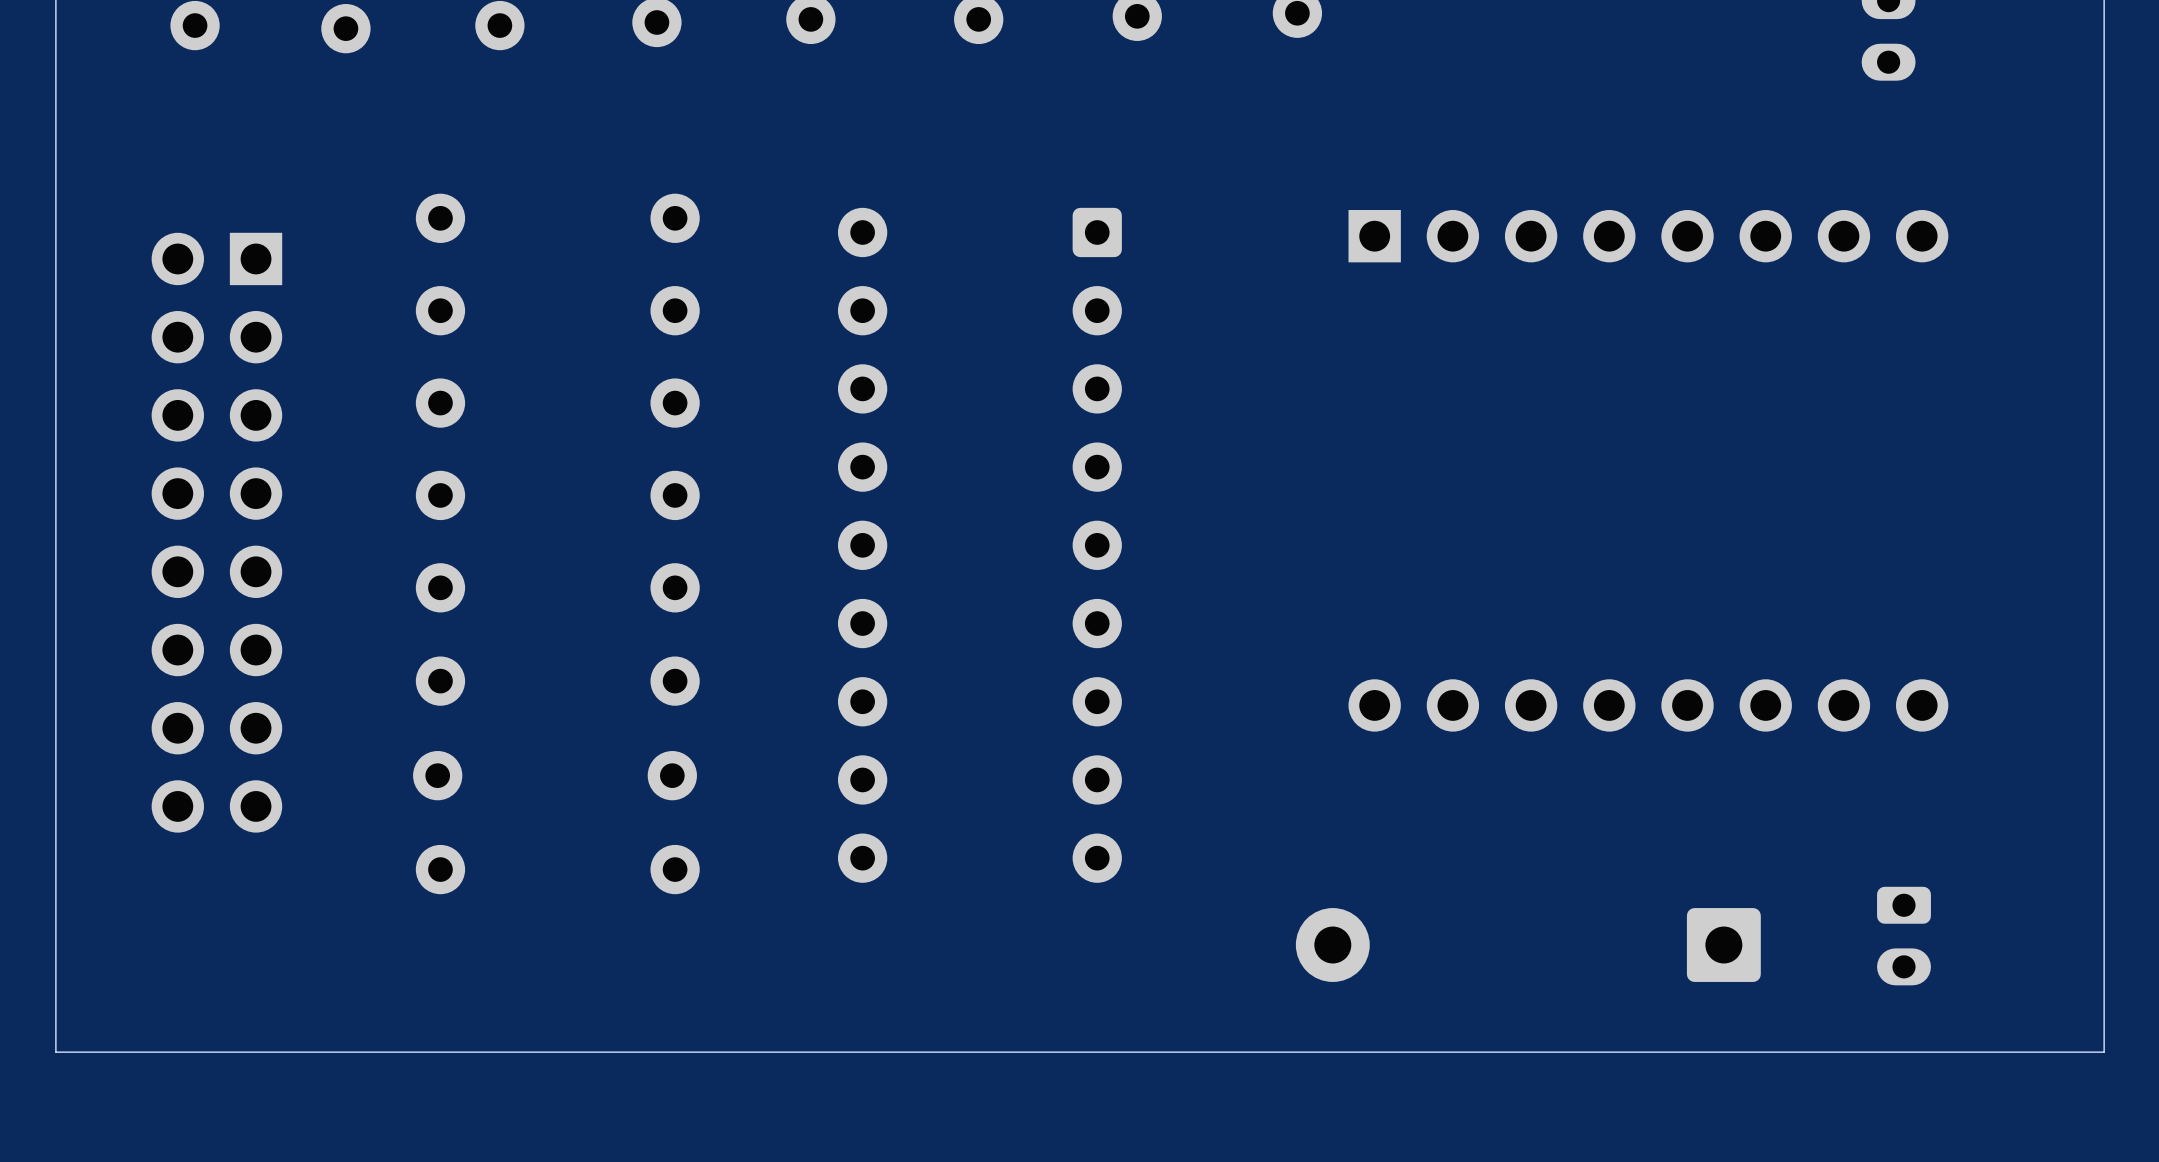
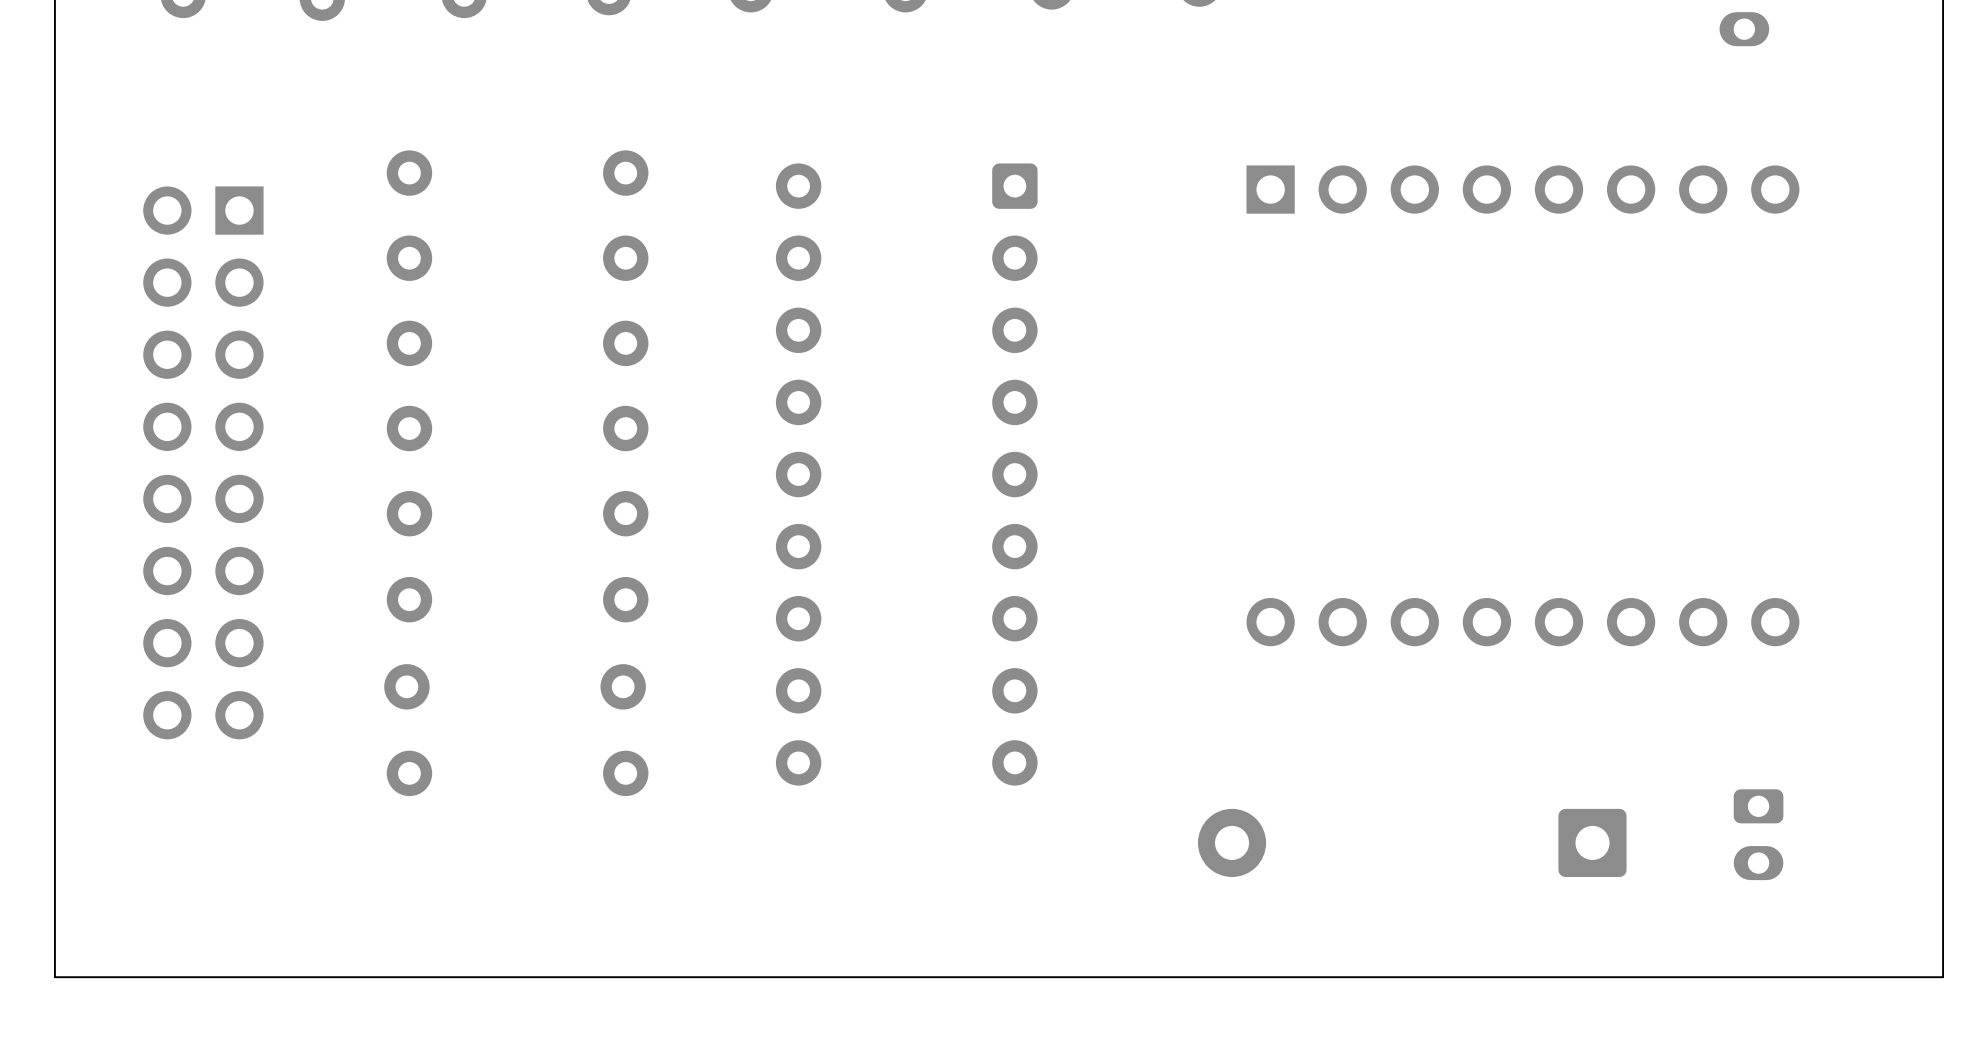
board edge: (2104, 1052) (55, 1052) -> (1943, 941) (1943, 977) (54, 977) (54, 941)

